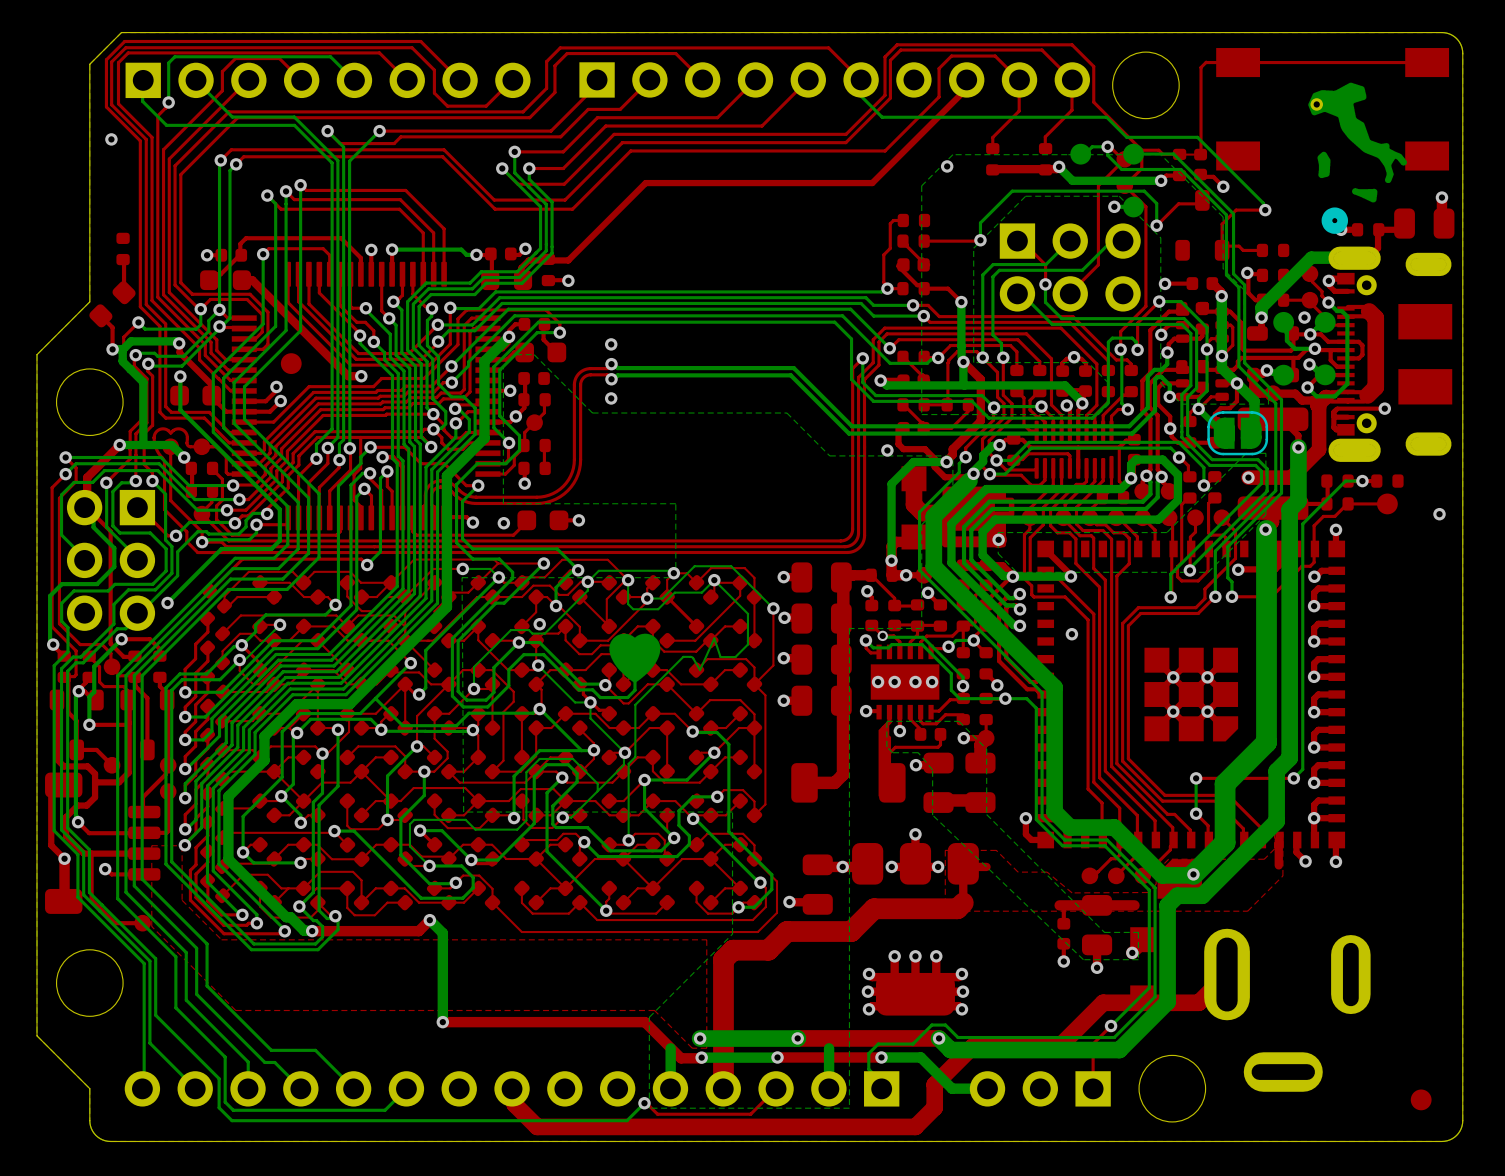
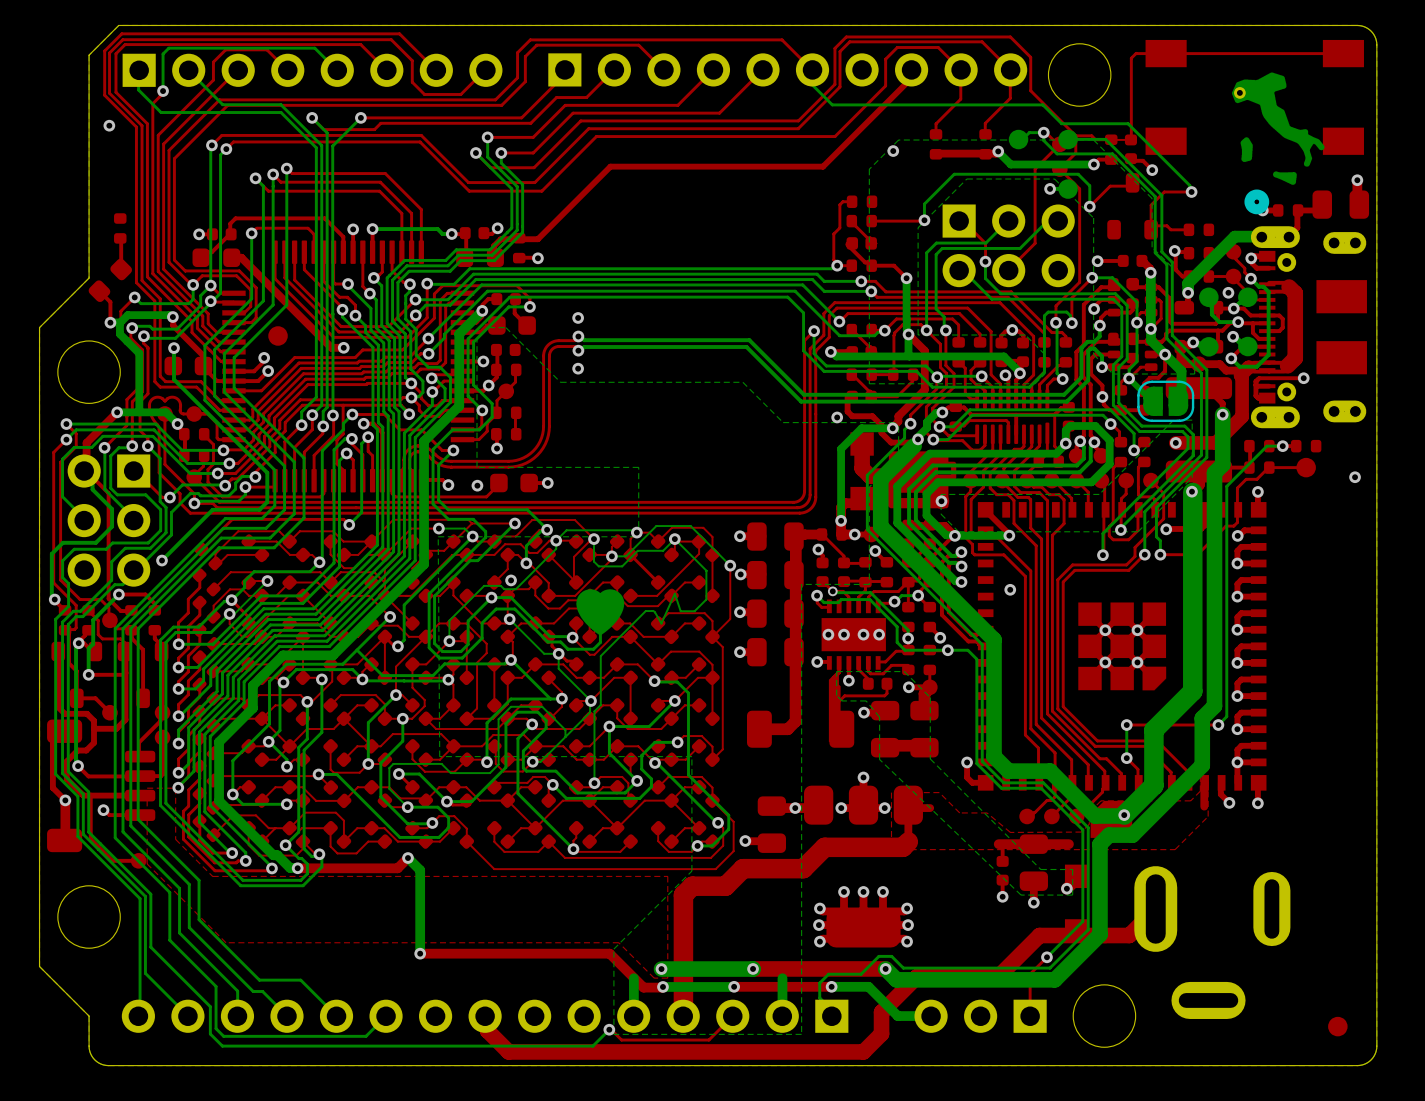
part footprint: [1321, 207, 1453, 462] -> [1244, 189, 1367, 429]

